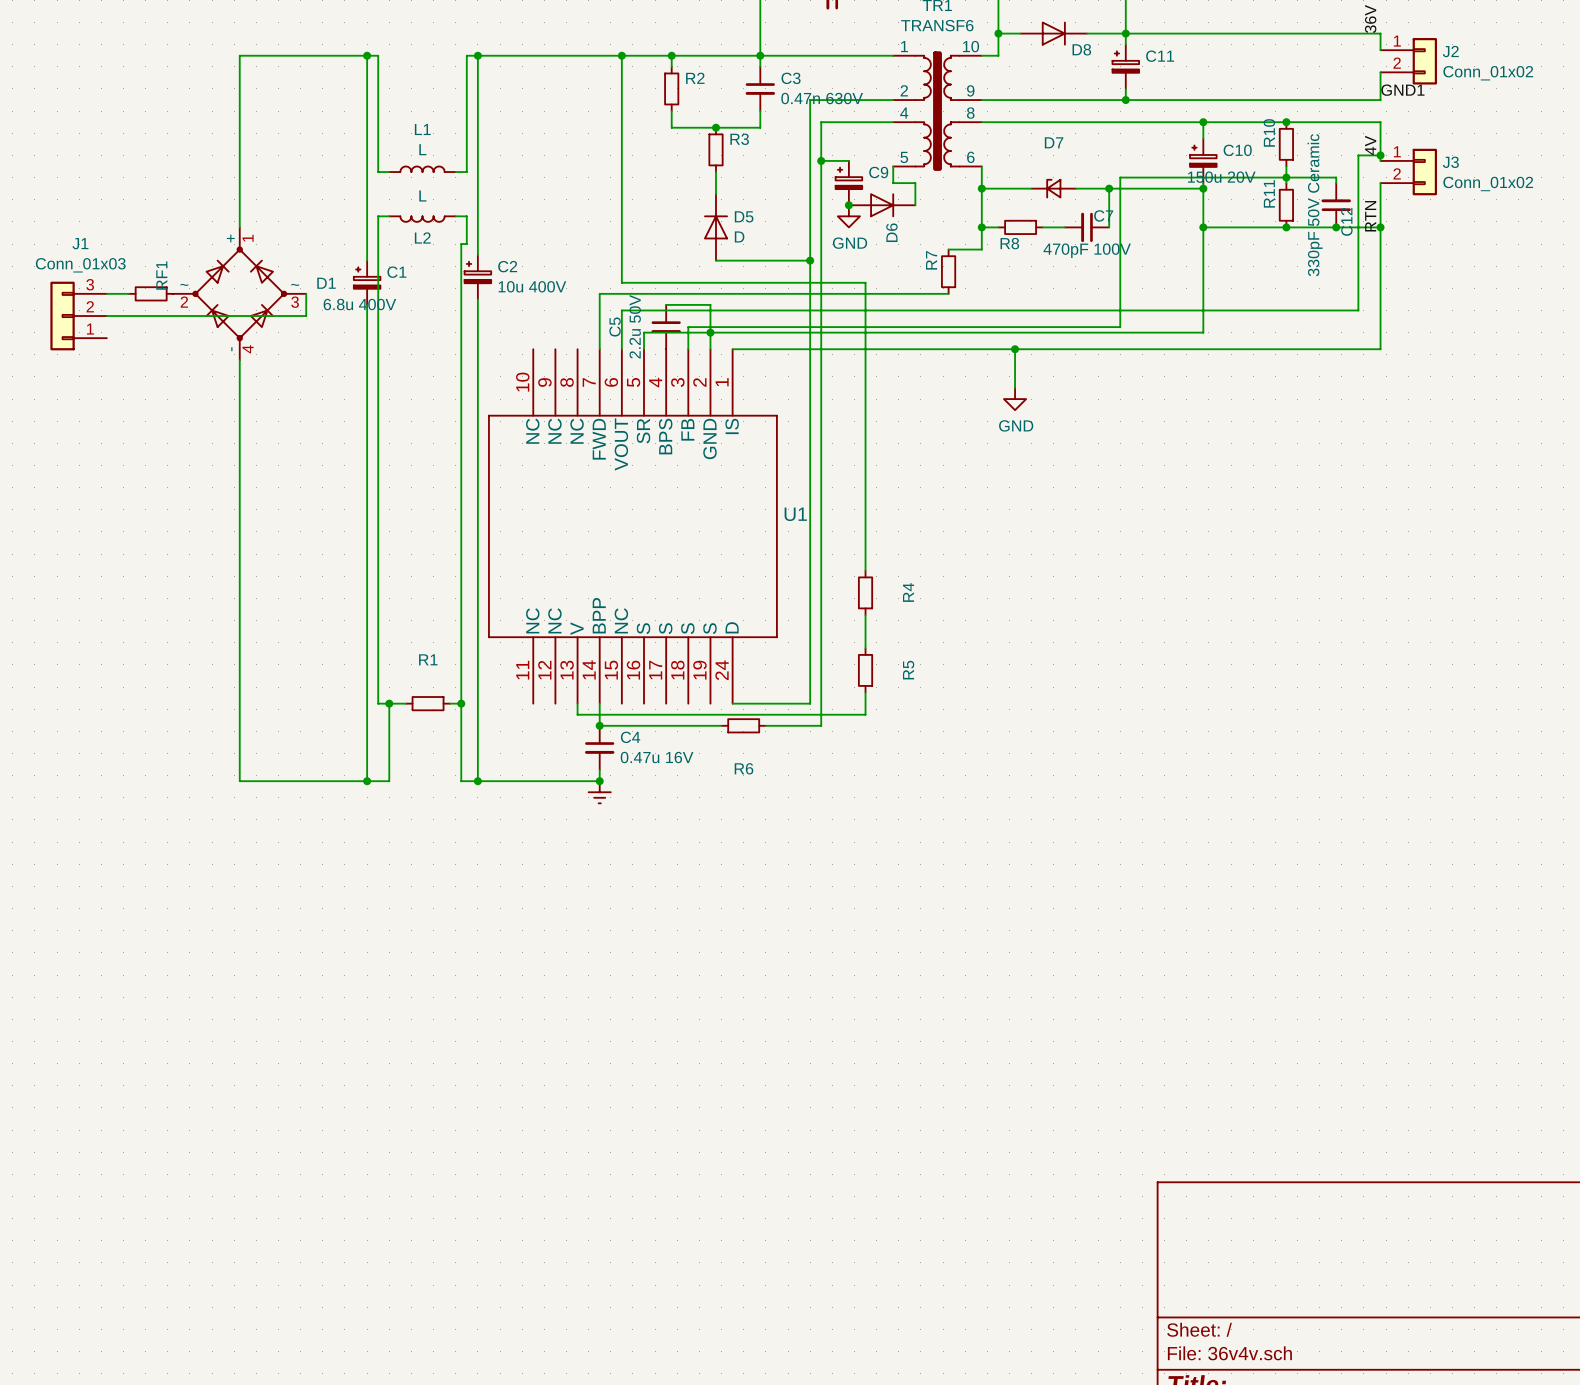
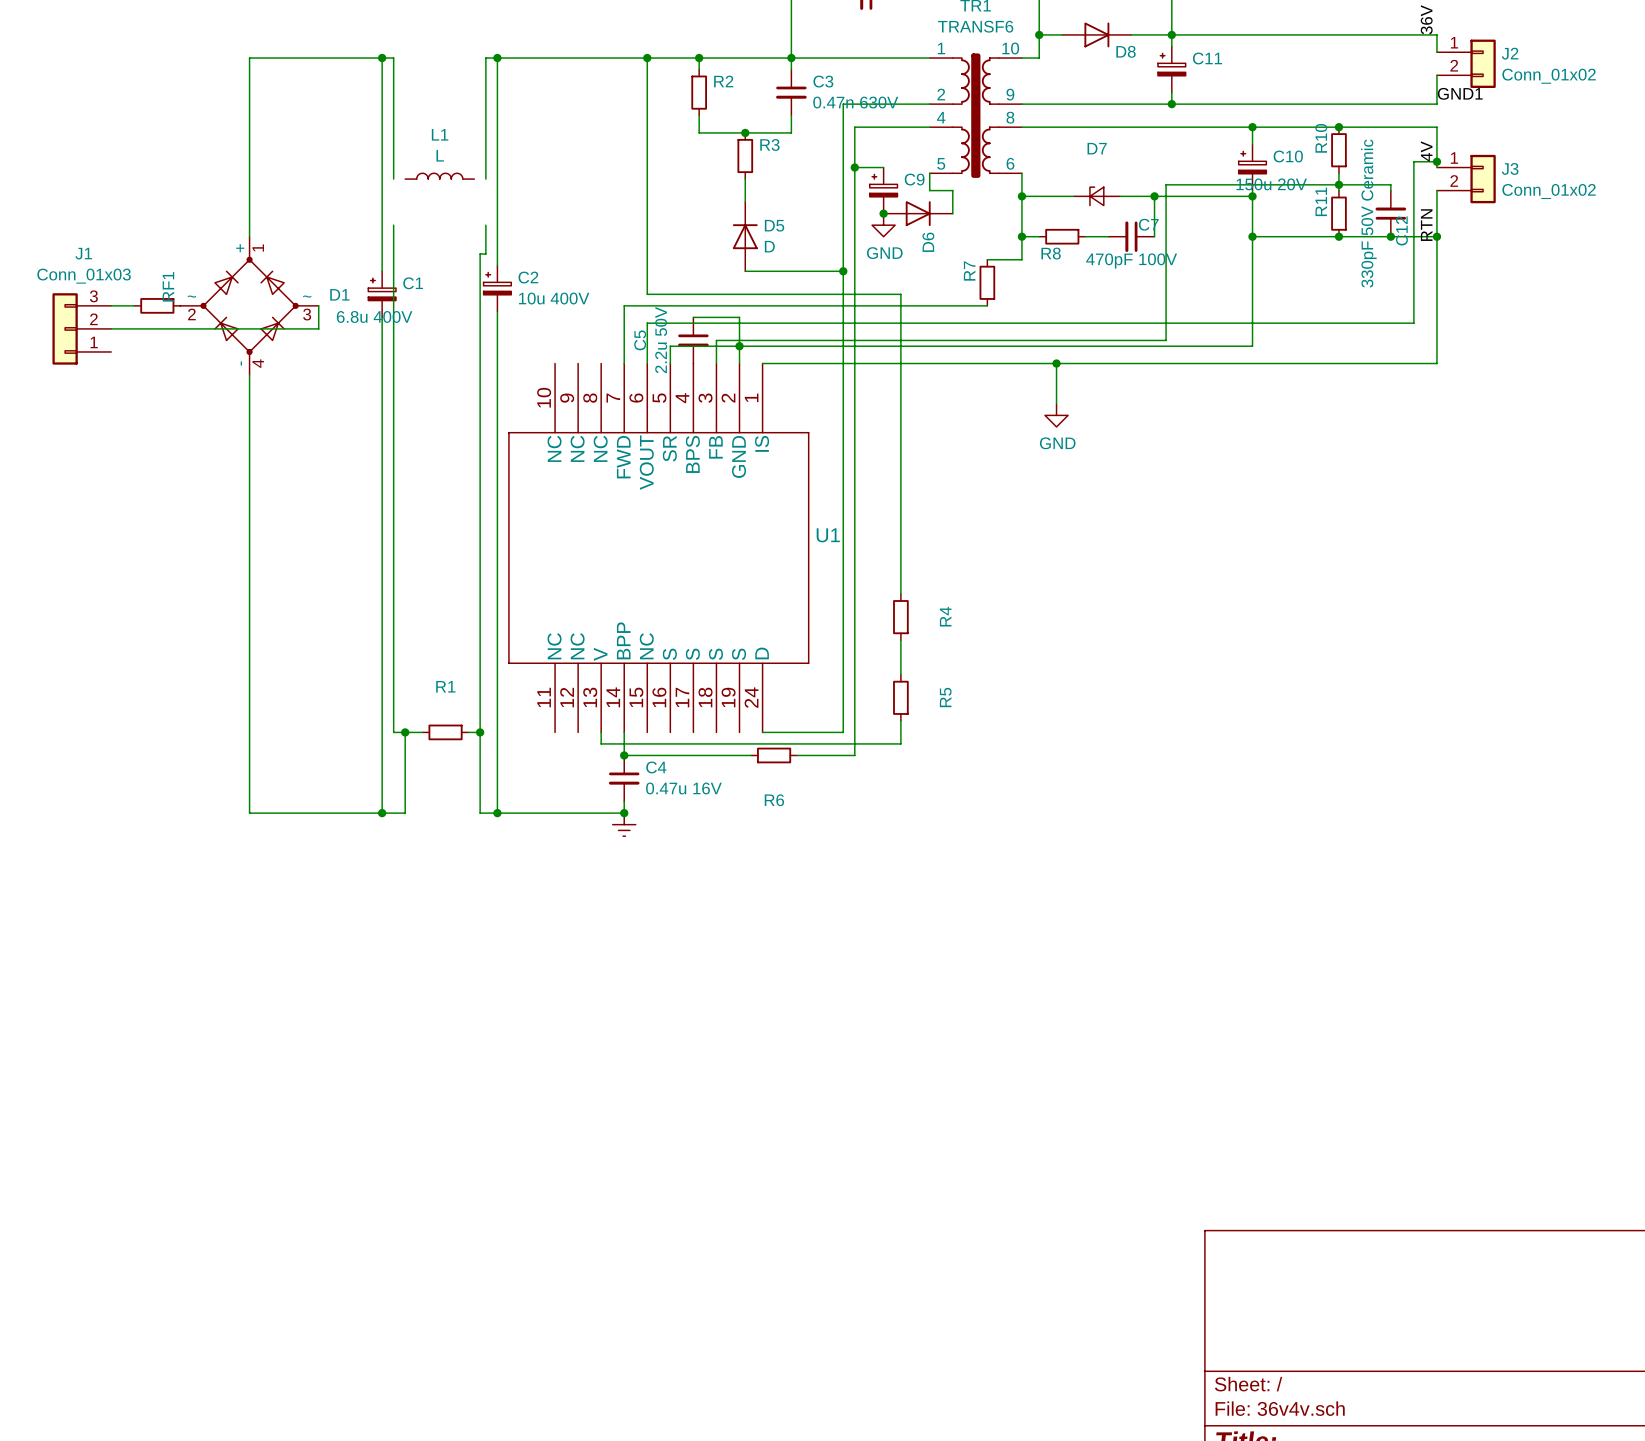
wire: (378, 172) (389, 172) -> none
wire: (455, 172) (466, 172) -> none
wire: (378, 216) (389, 216) -> none
wire: (455, 216) (466, 216) -> none
L2: L (422, 219) -> none

